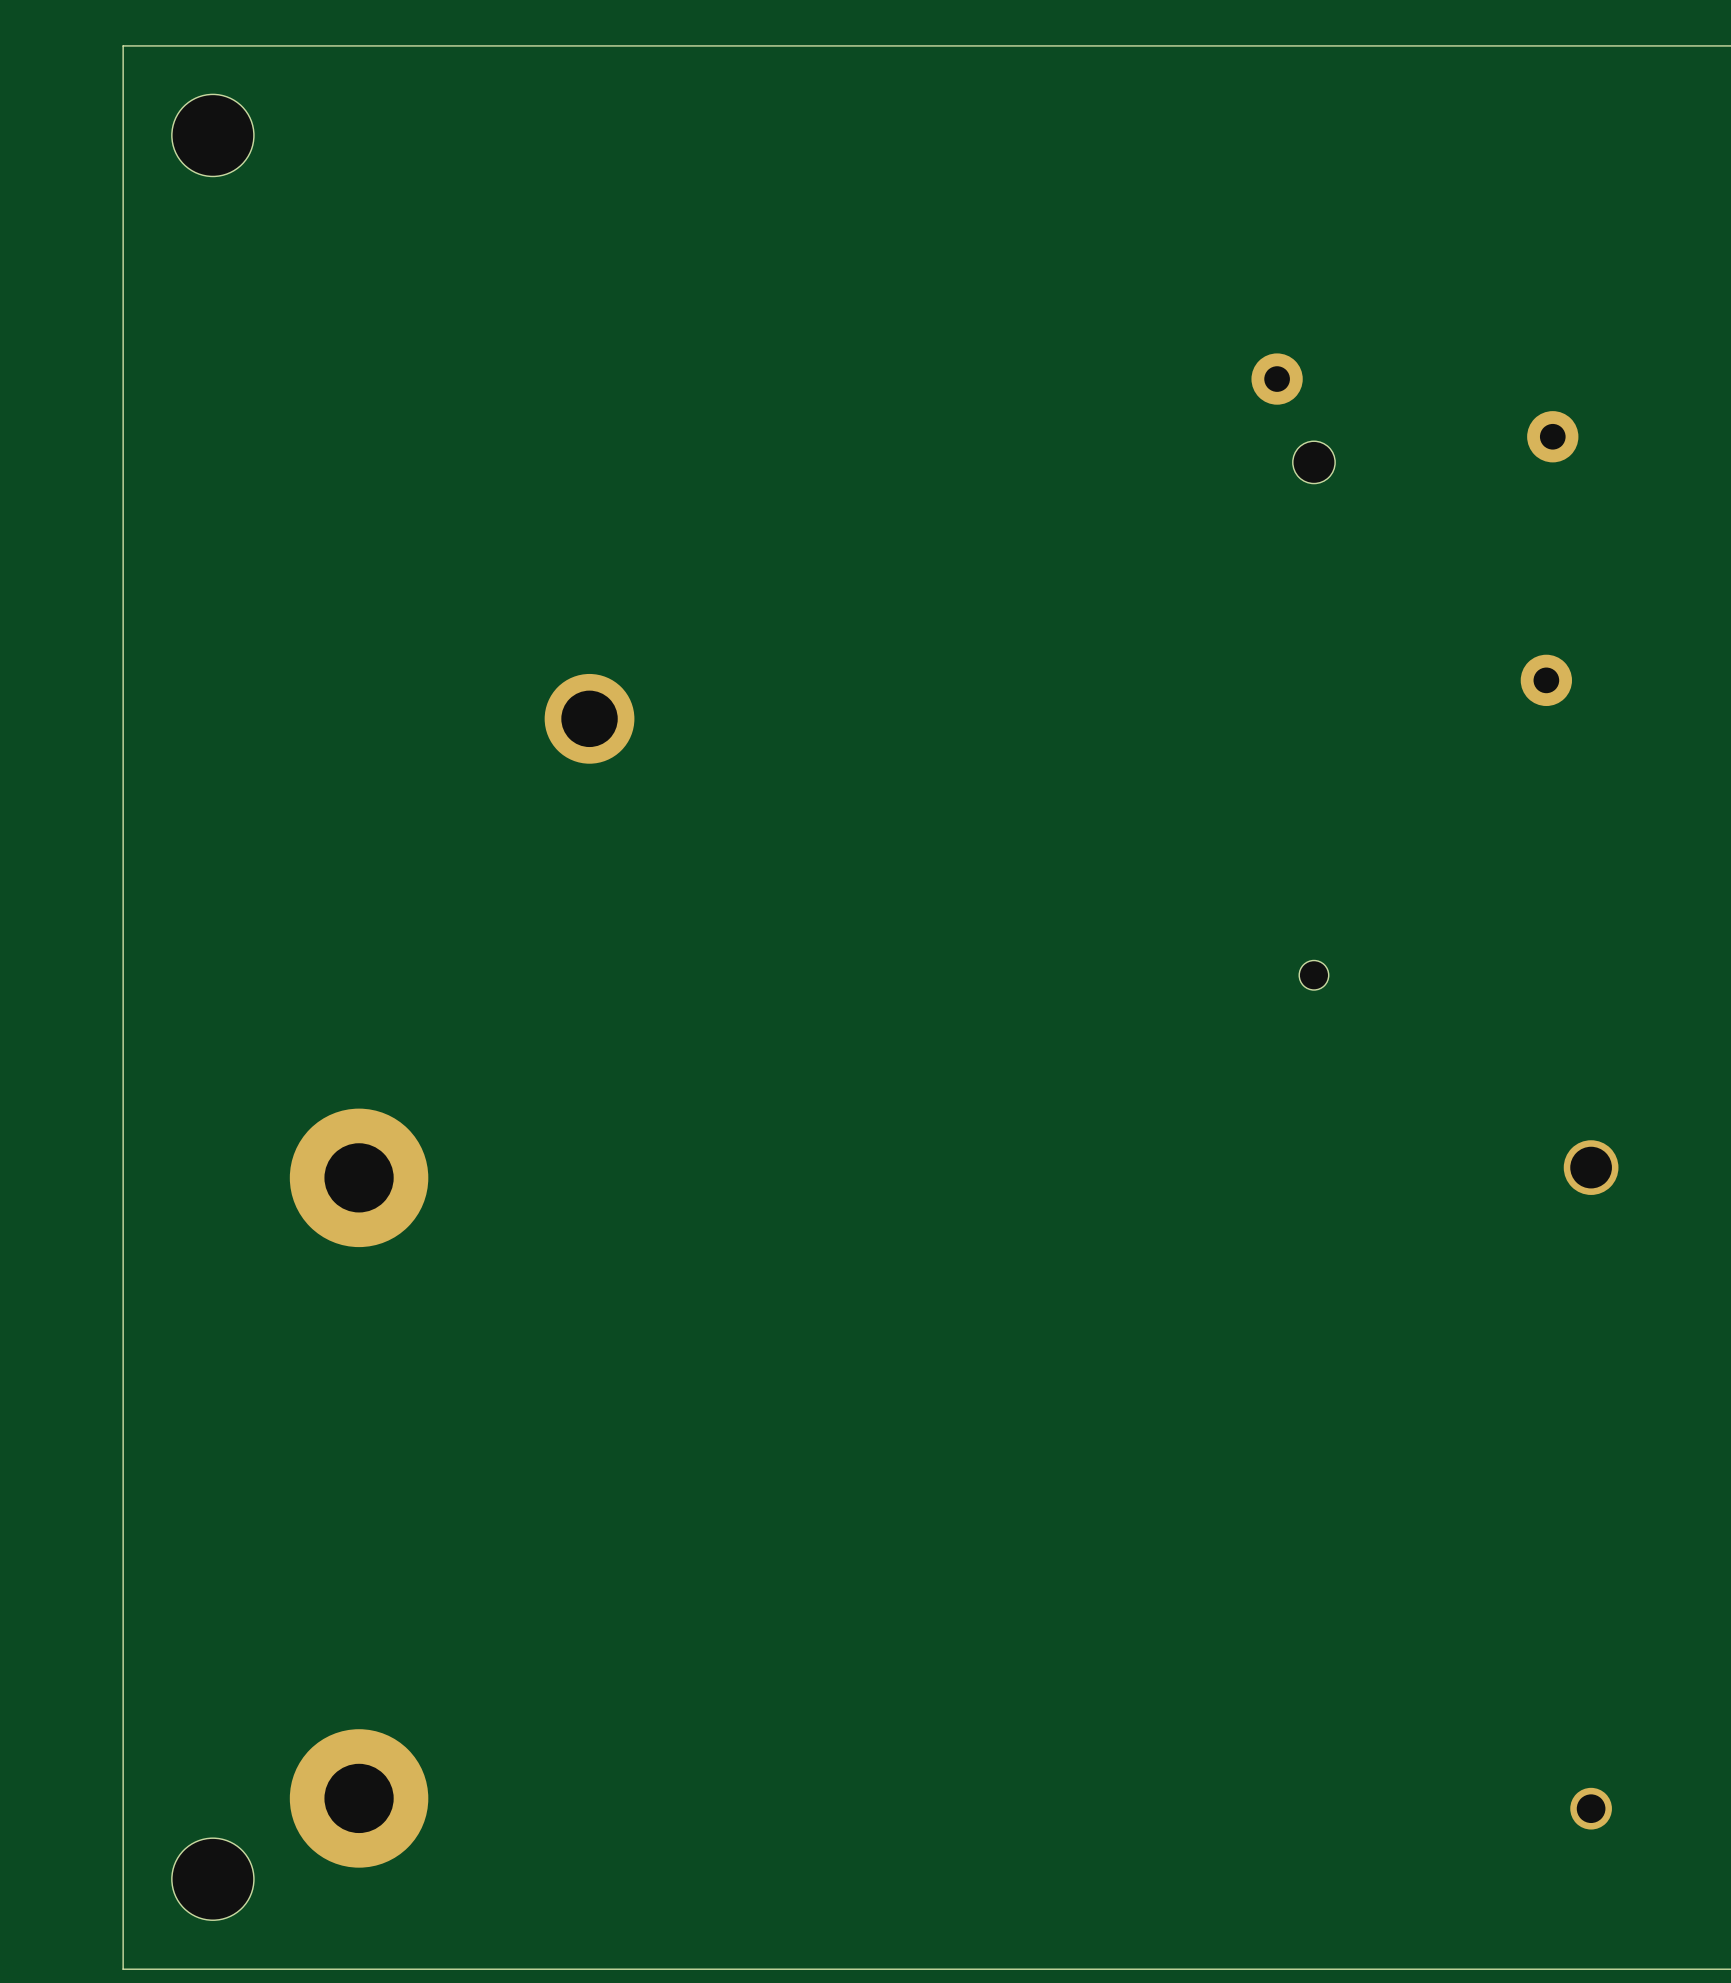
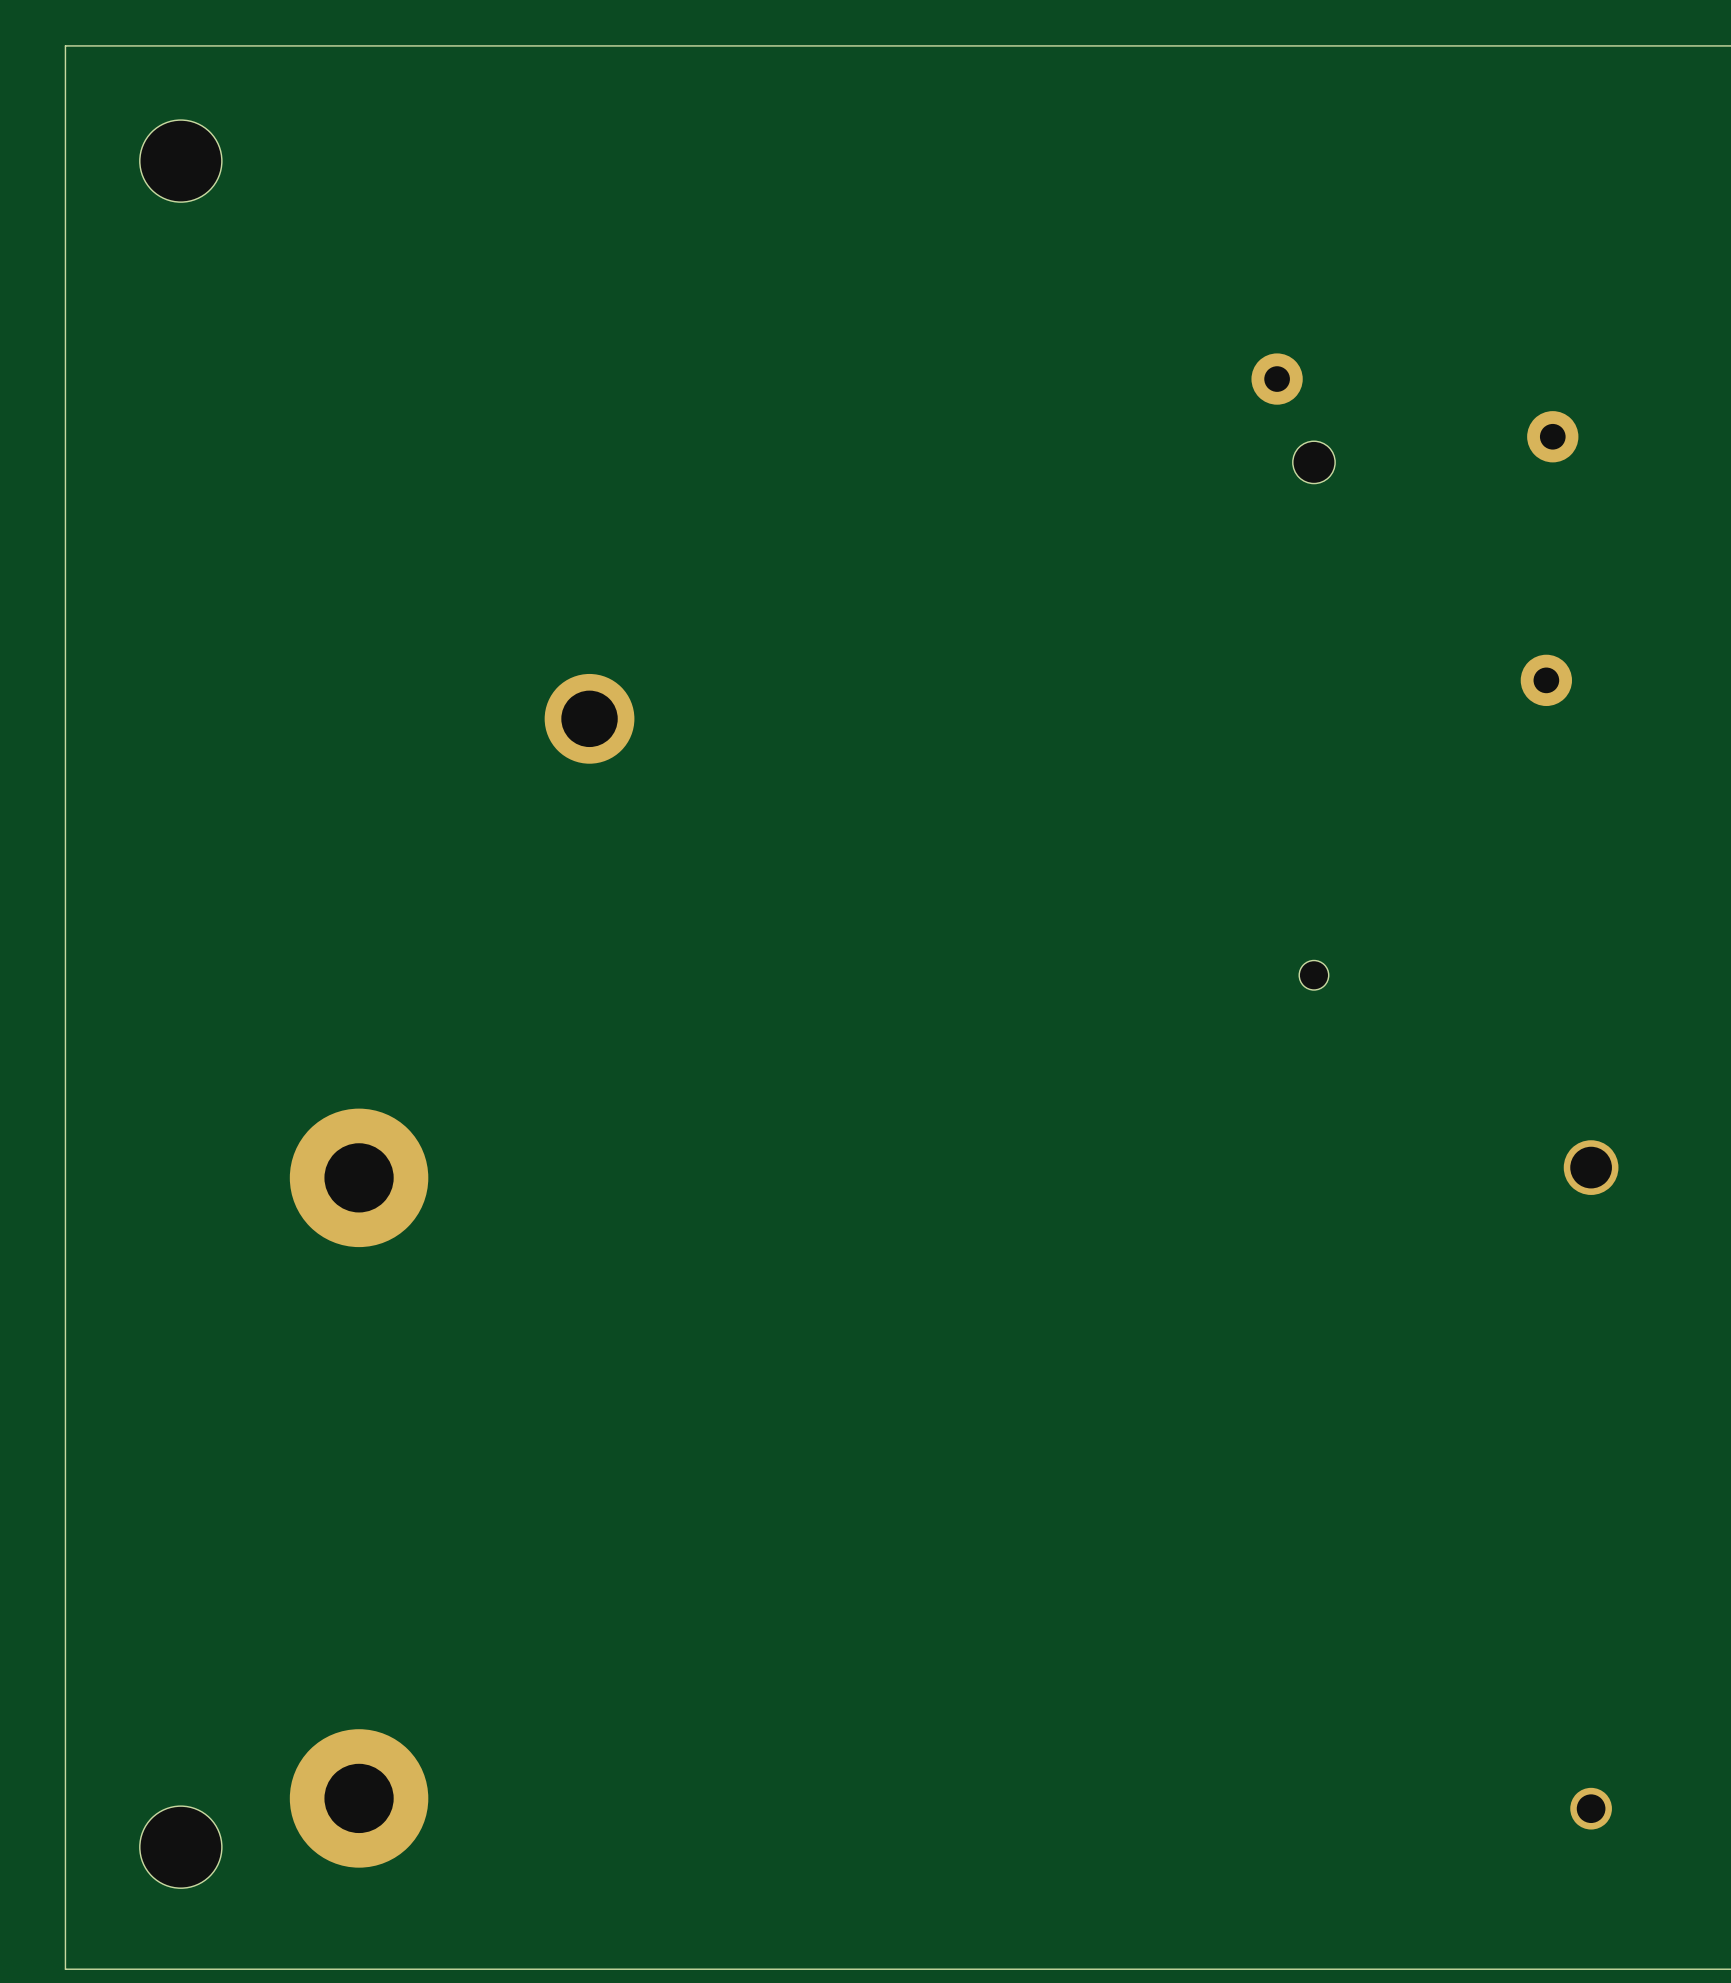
board edge: (123, 45) (123, 1969) -> (123, 45) (65, 45) (65, 1969) (123, 1969)
part position: (212, 135) -> (180, 161)
part position: (212, 1879) -> (180, 1847)

